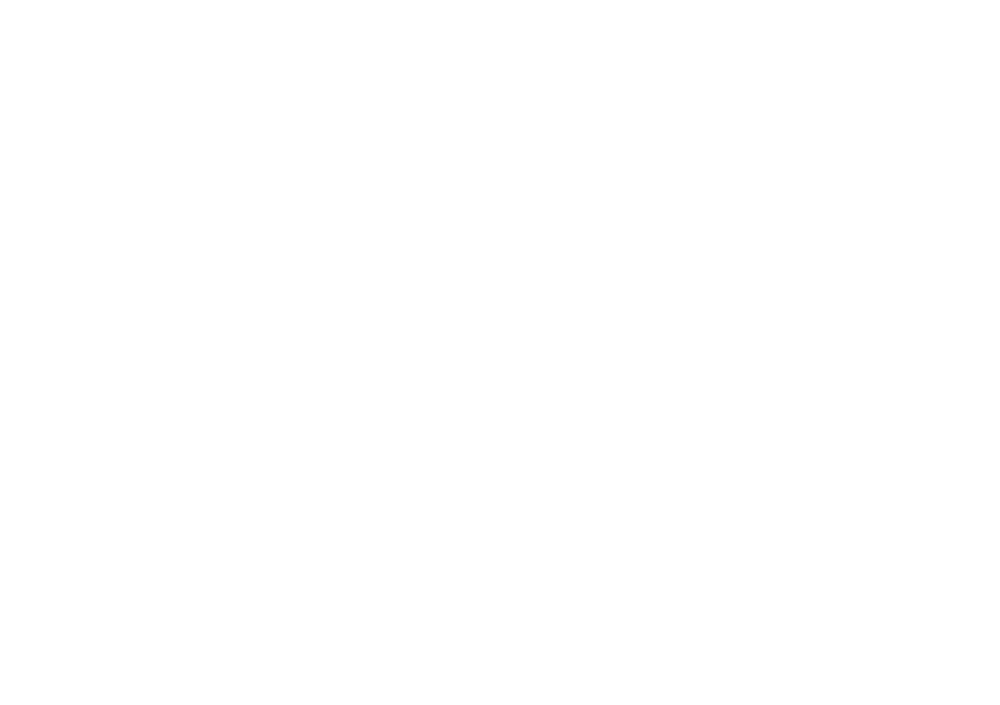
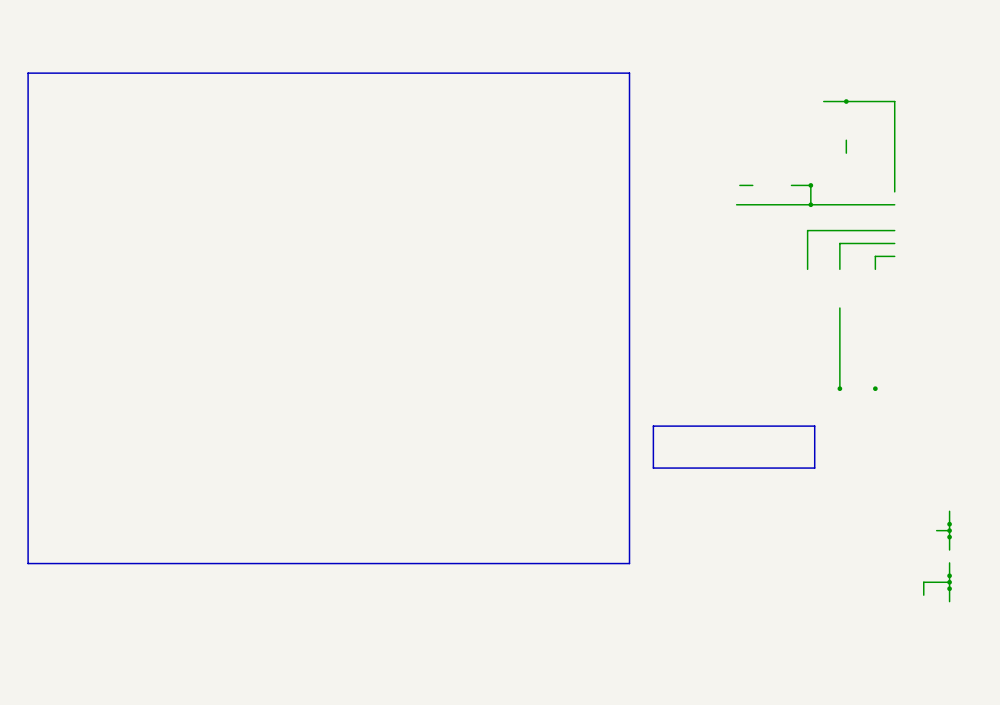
line: none -> (28, 73) (629, 73) (629, 563) (28, 563) (28, 73)
wire: none -> (823, 101) (894, 101) (894, 191)
junction: none -> (846, 101)
wire: none -> (846, 140) (846, 153)
wire: none -> (739, 185) (752, 185)
wire: none -> (791, 185) (810, 185) (810, 204)
junction: none -> (810, 185)
wire: none -> (736, 204) (894, 204)
junction: none -> (810, 204)
wire: none -> (894, 230) (807, 230) (807, 269)
wire: none -> (894, 243) (839, 243) (839, 269)
wire: none -> (894, 256) (875, 256) (875, 269)
wire: none -> (839, 308) (839, 388)
junction: none -> (839, 388)
junction: none -> (875, 388)
line: none -> (653, 426) (814, 426) (814, 468) (653, 468) (653, 426)
wire: none -> (949, 511) (949, 550)
junction: none -> (949, 524)
wire: none -> (936, 530) (949, 530)
junction: none -> (949, 530)
junction: none -> (949, 537)
wire: none -> (949, 562) (949, 601)
junction: none -> (949, 575)
wire: none -> (949, 582) (923, 582) (923, 595)
junction: none -> (949, 582)
junction: none -> (949, 588)

